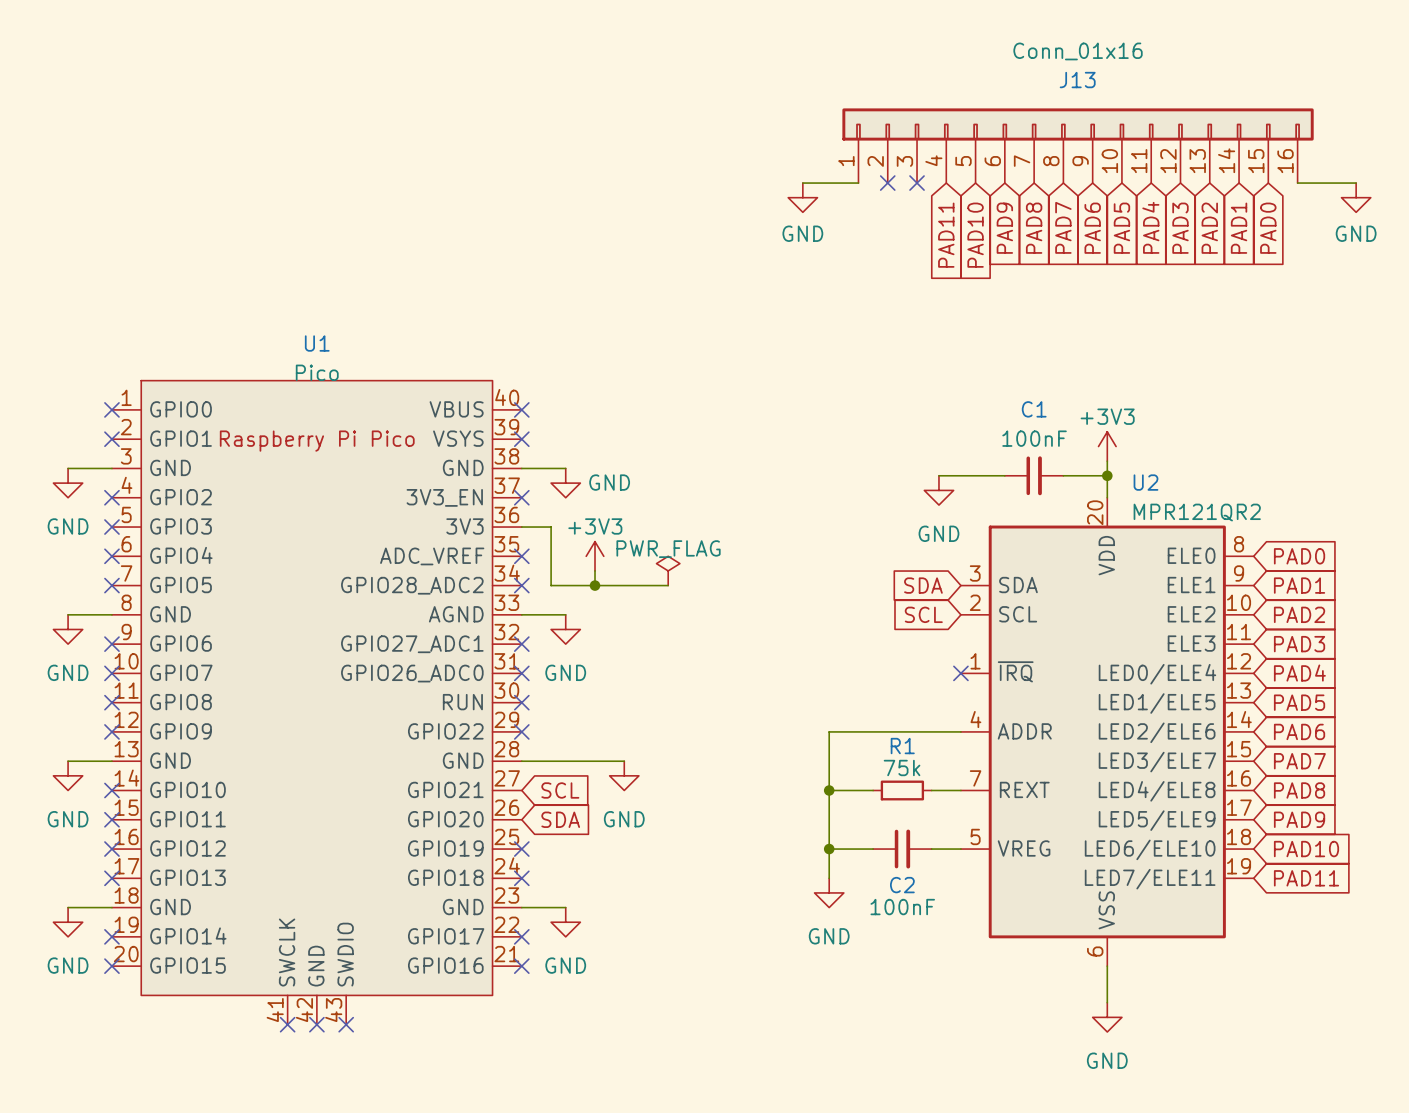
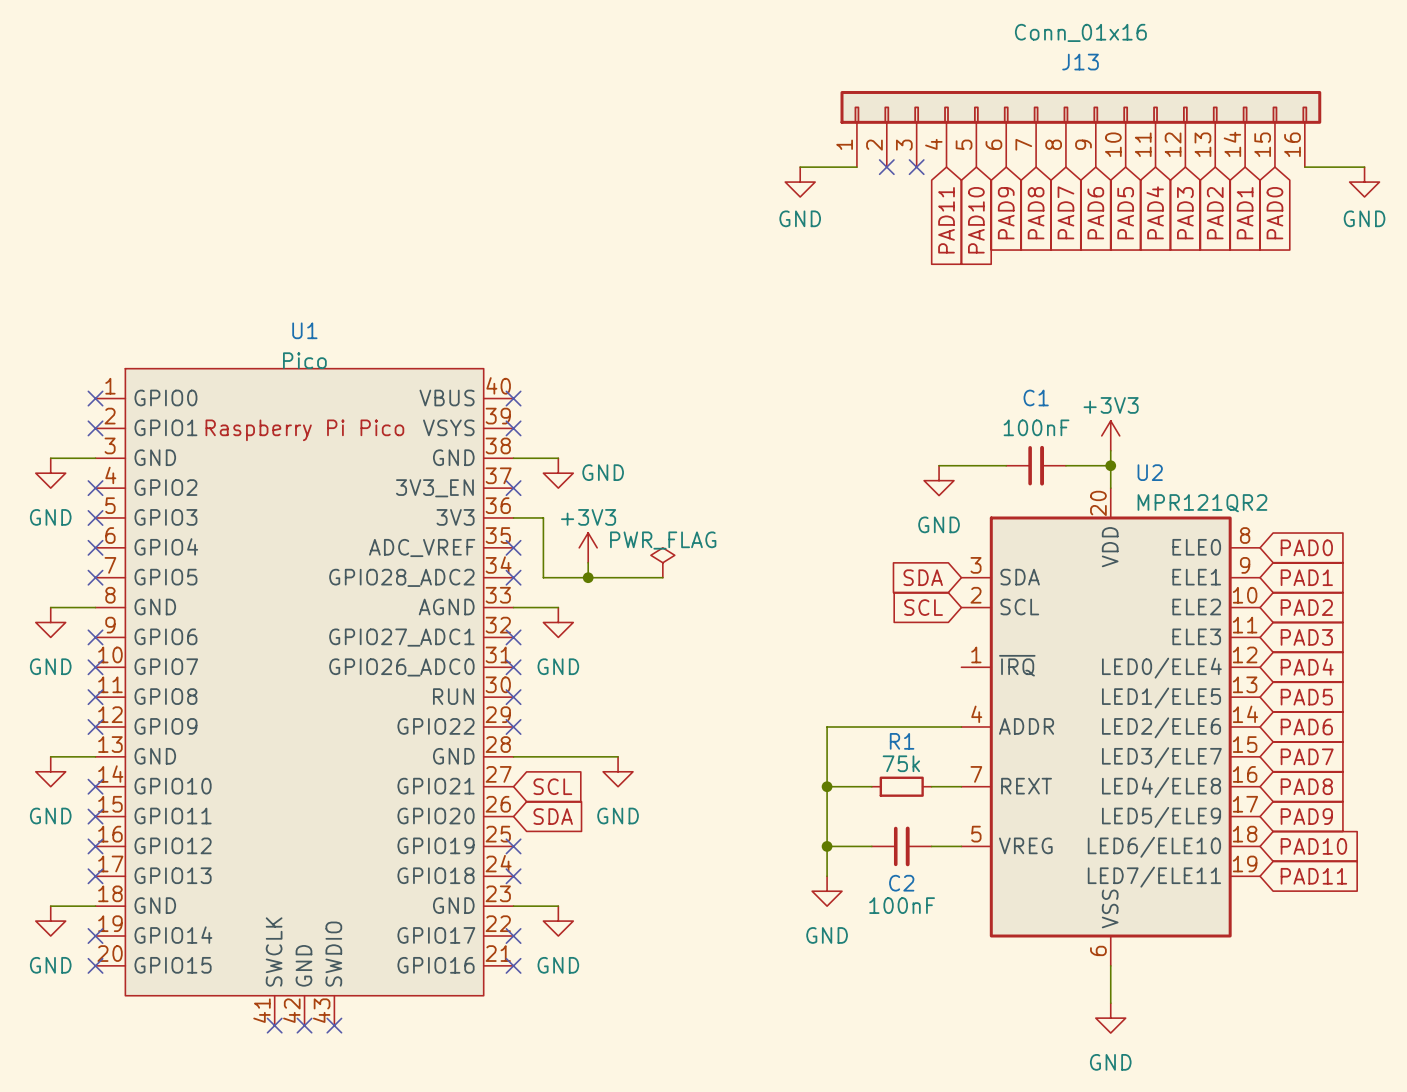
no-connect mark: (960, 673) -> none

